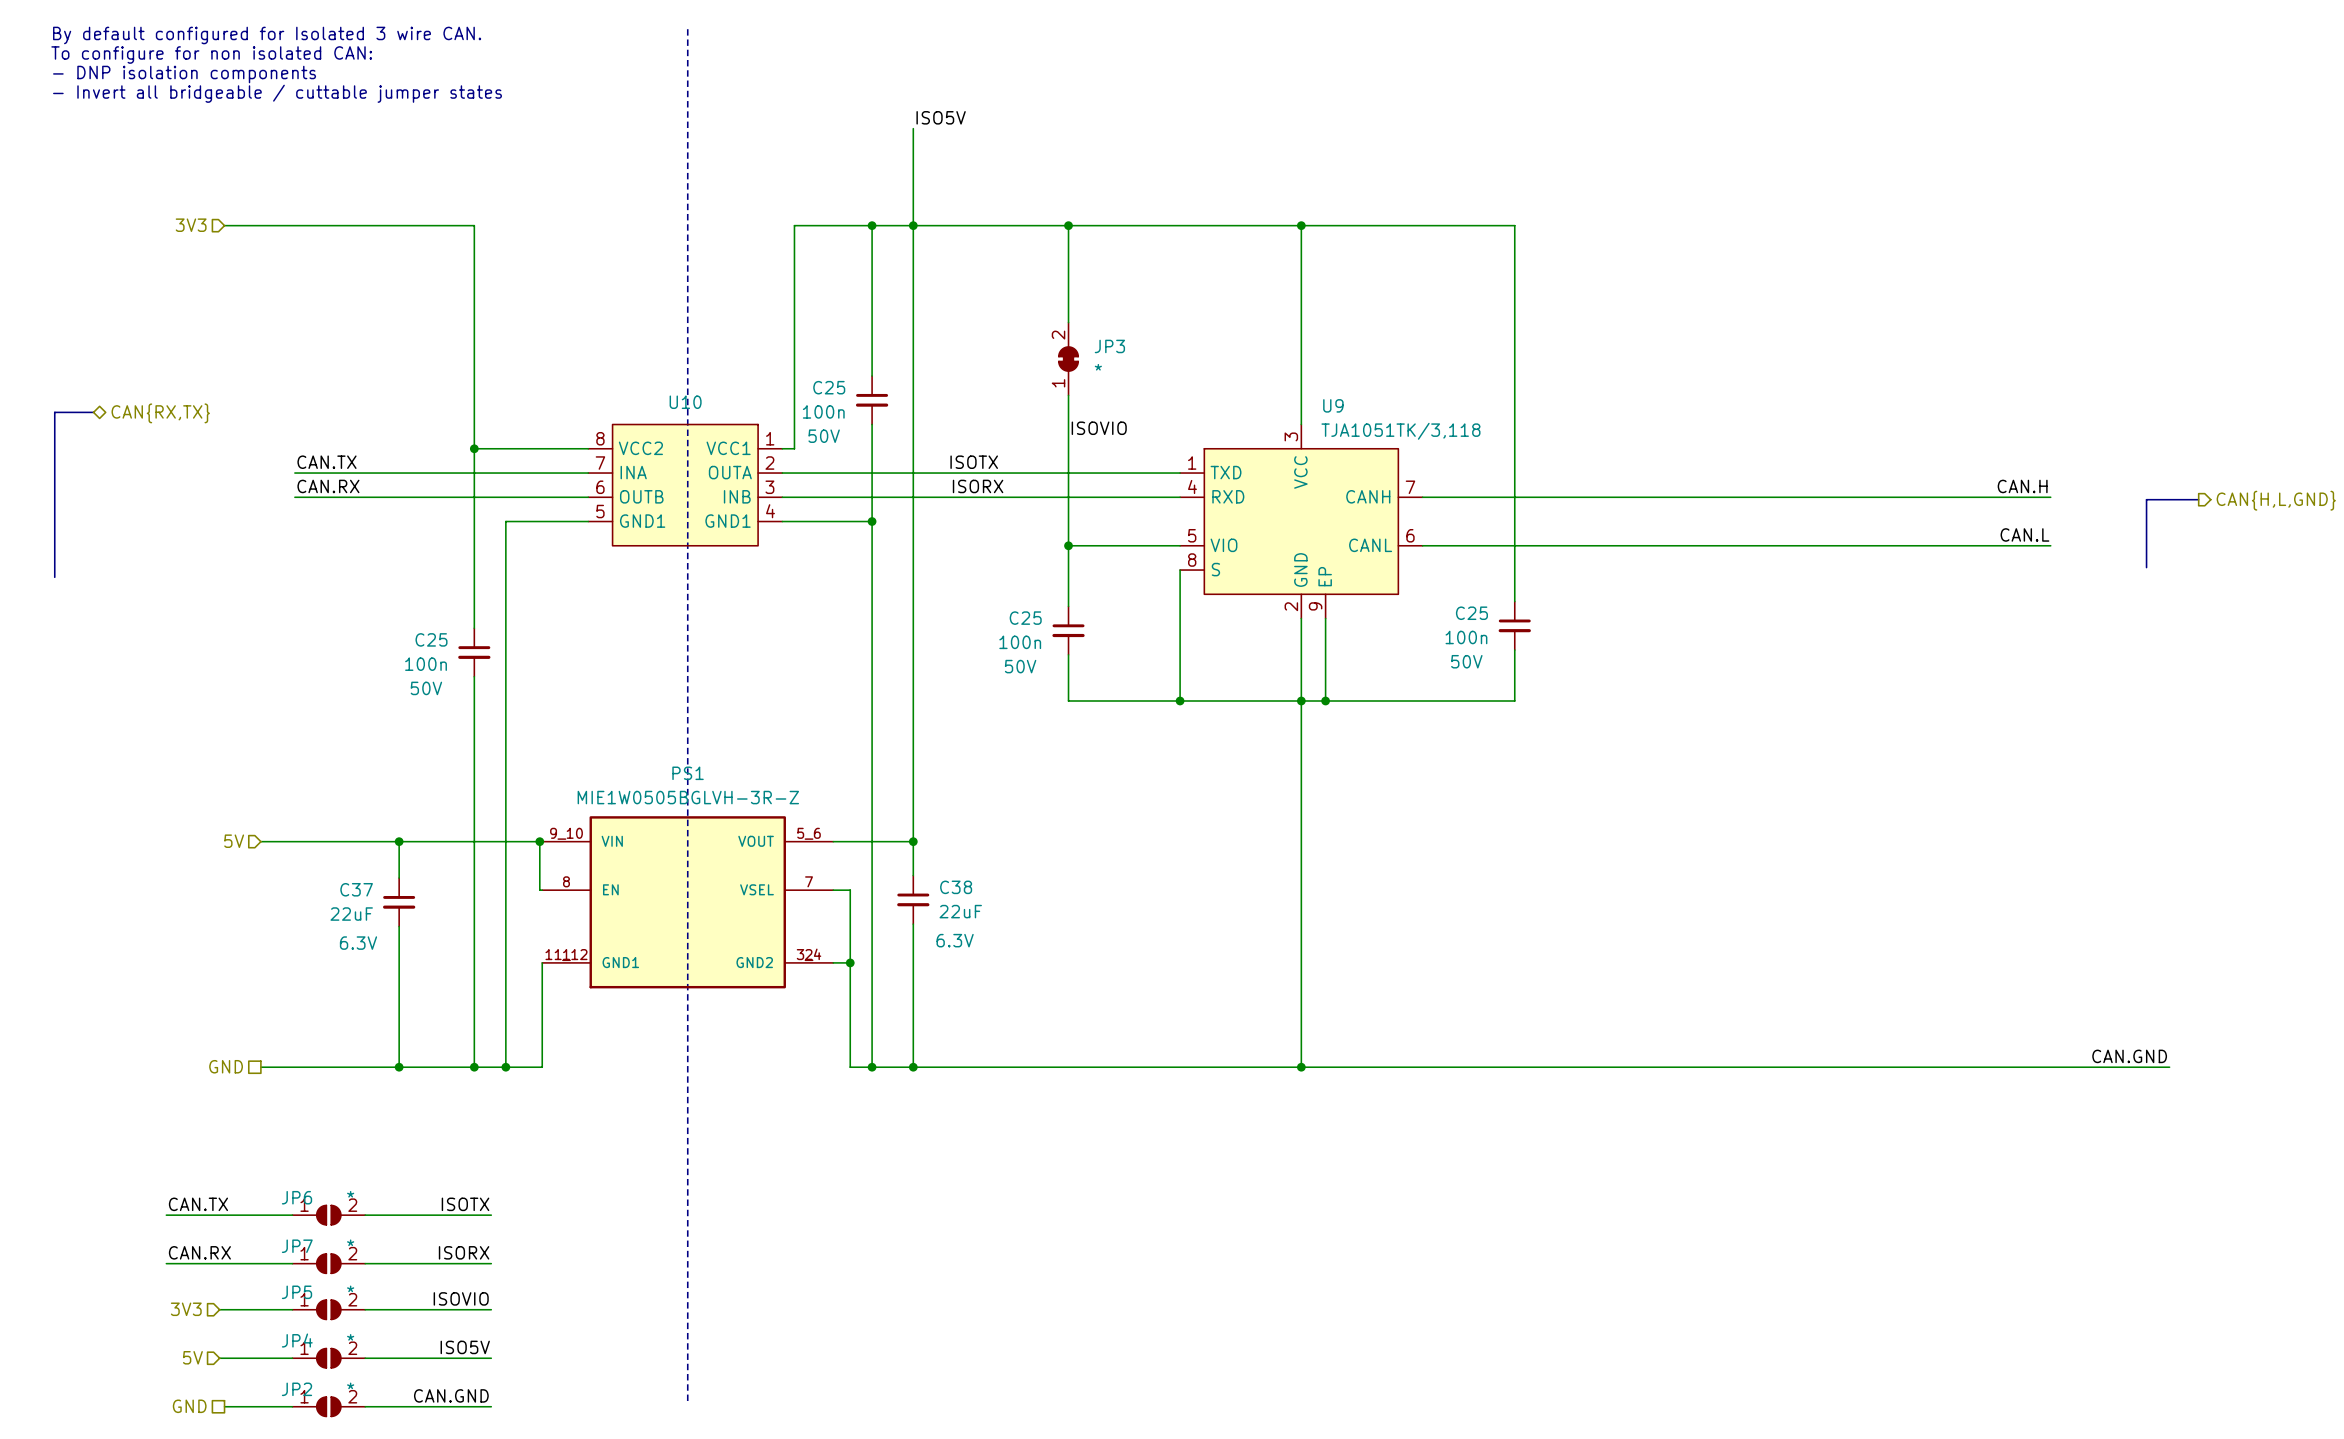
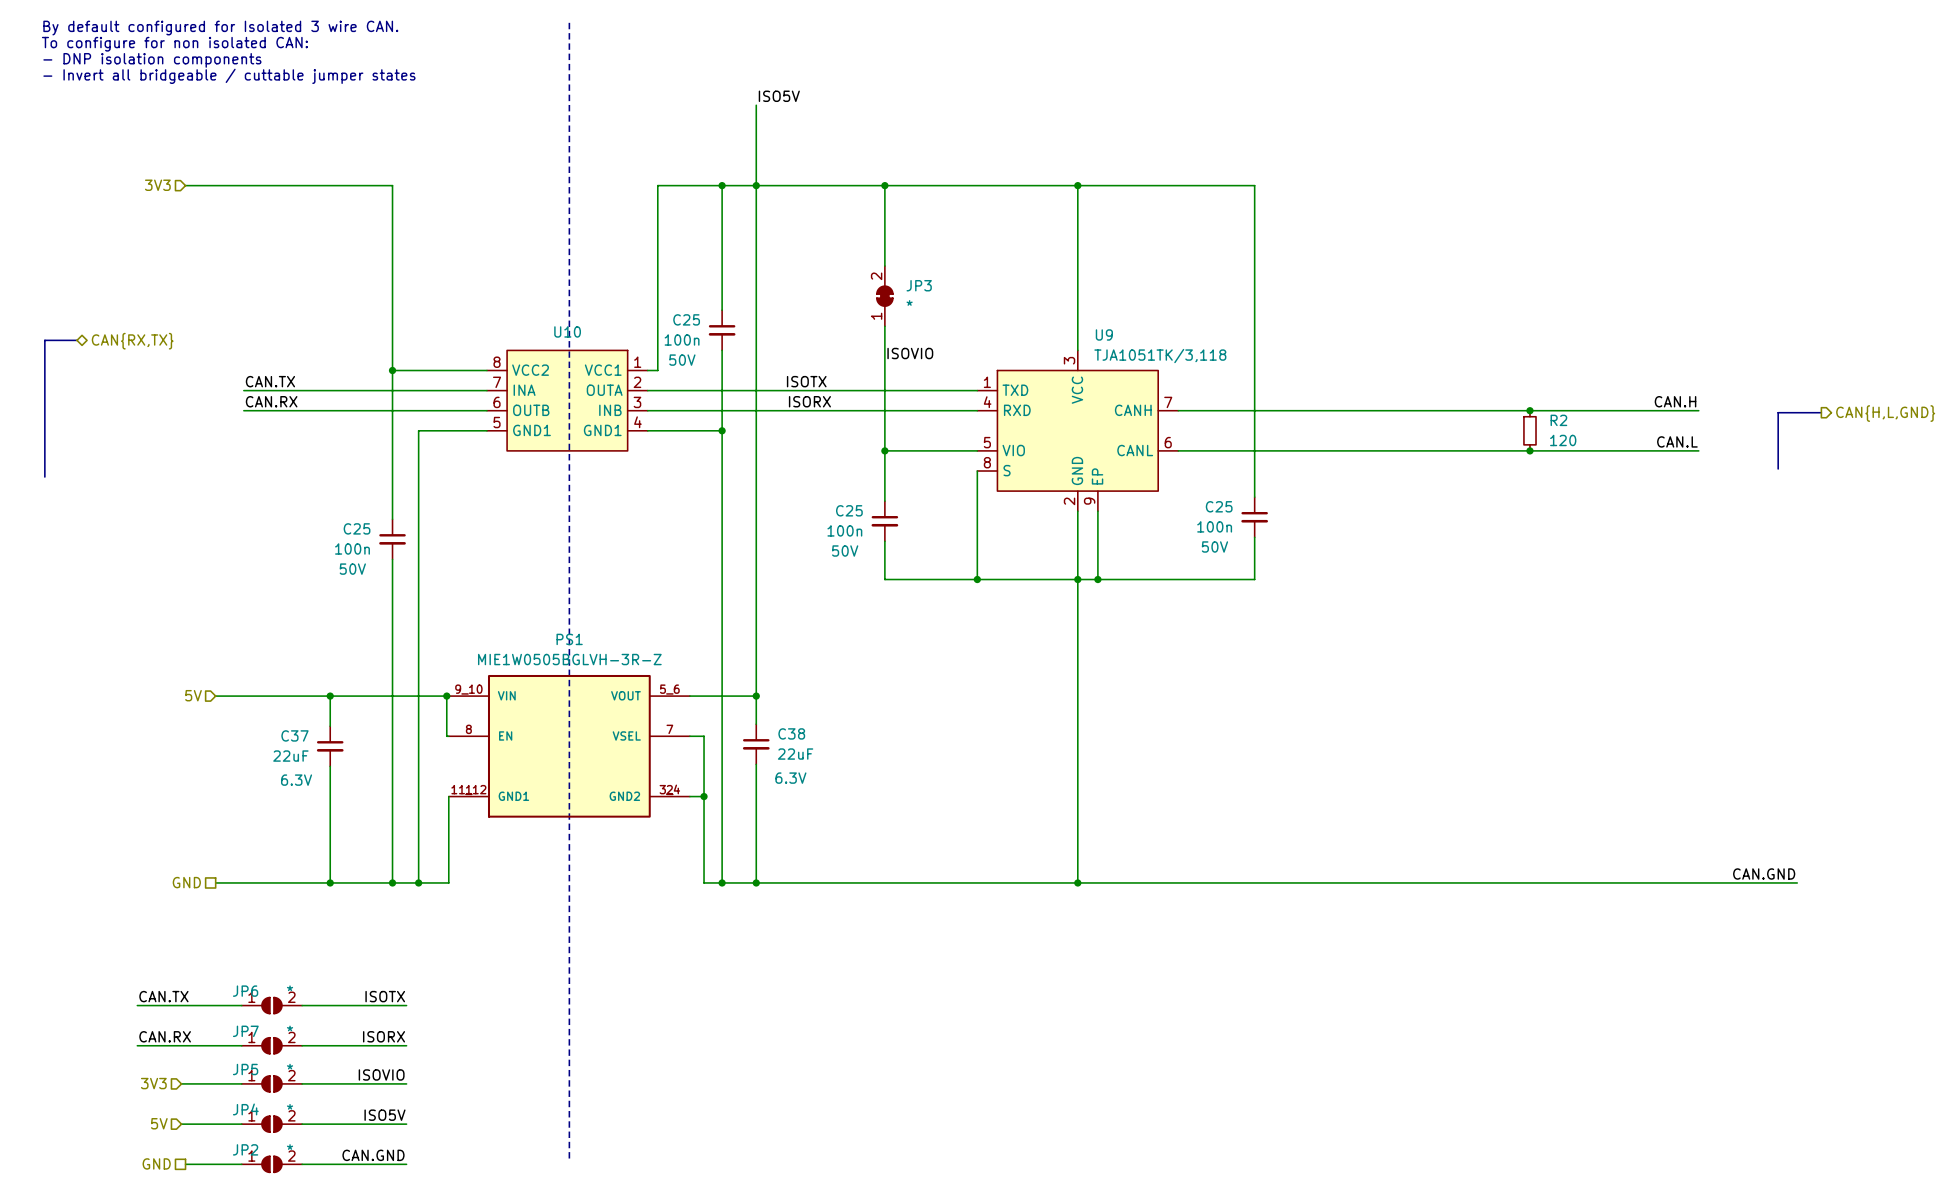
junction: none -> (1529, 410)
R2: none -> 120 (1529, 430)
junction: none -> (1529, 450)

